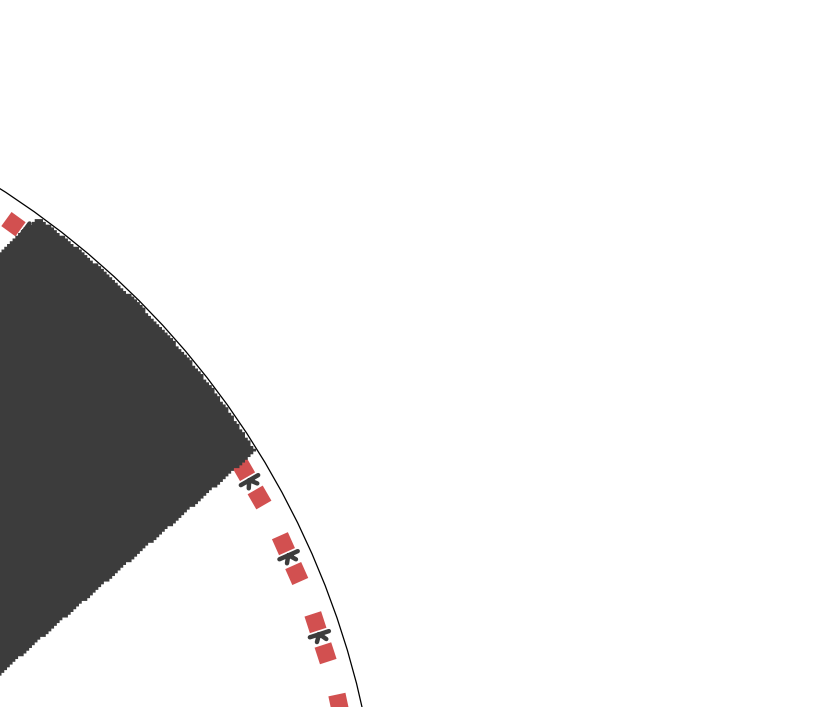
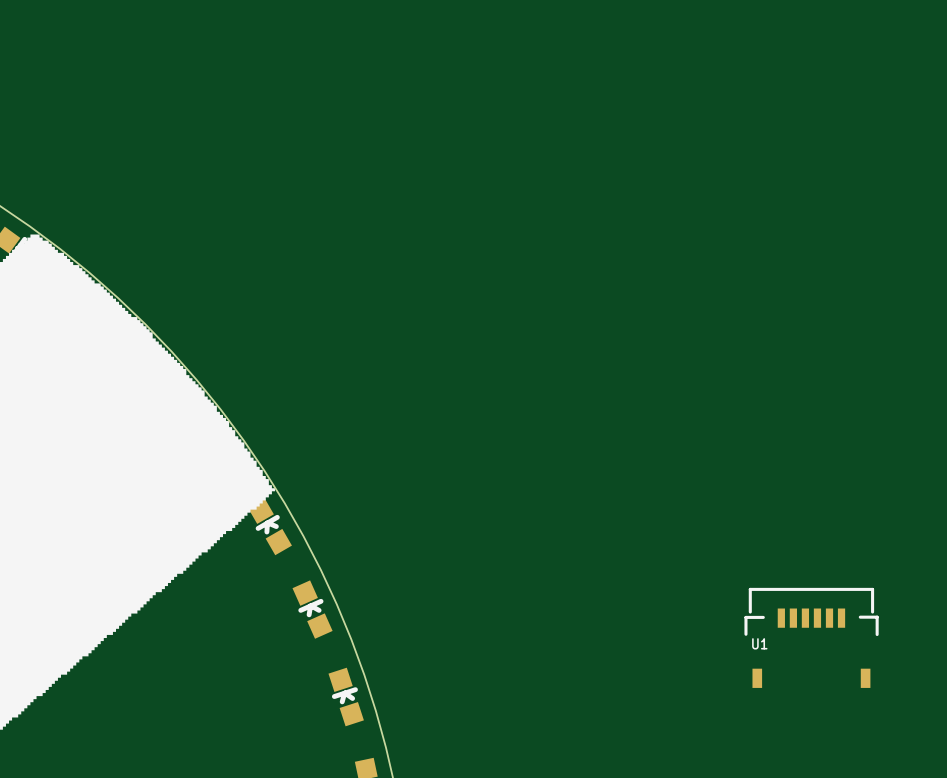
U1: none -> (811, 637)

